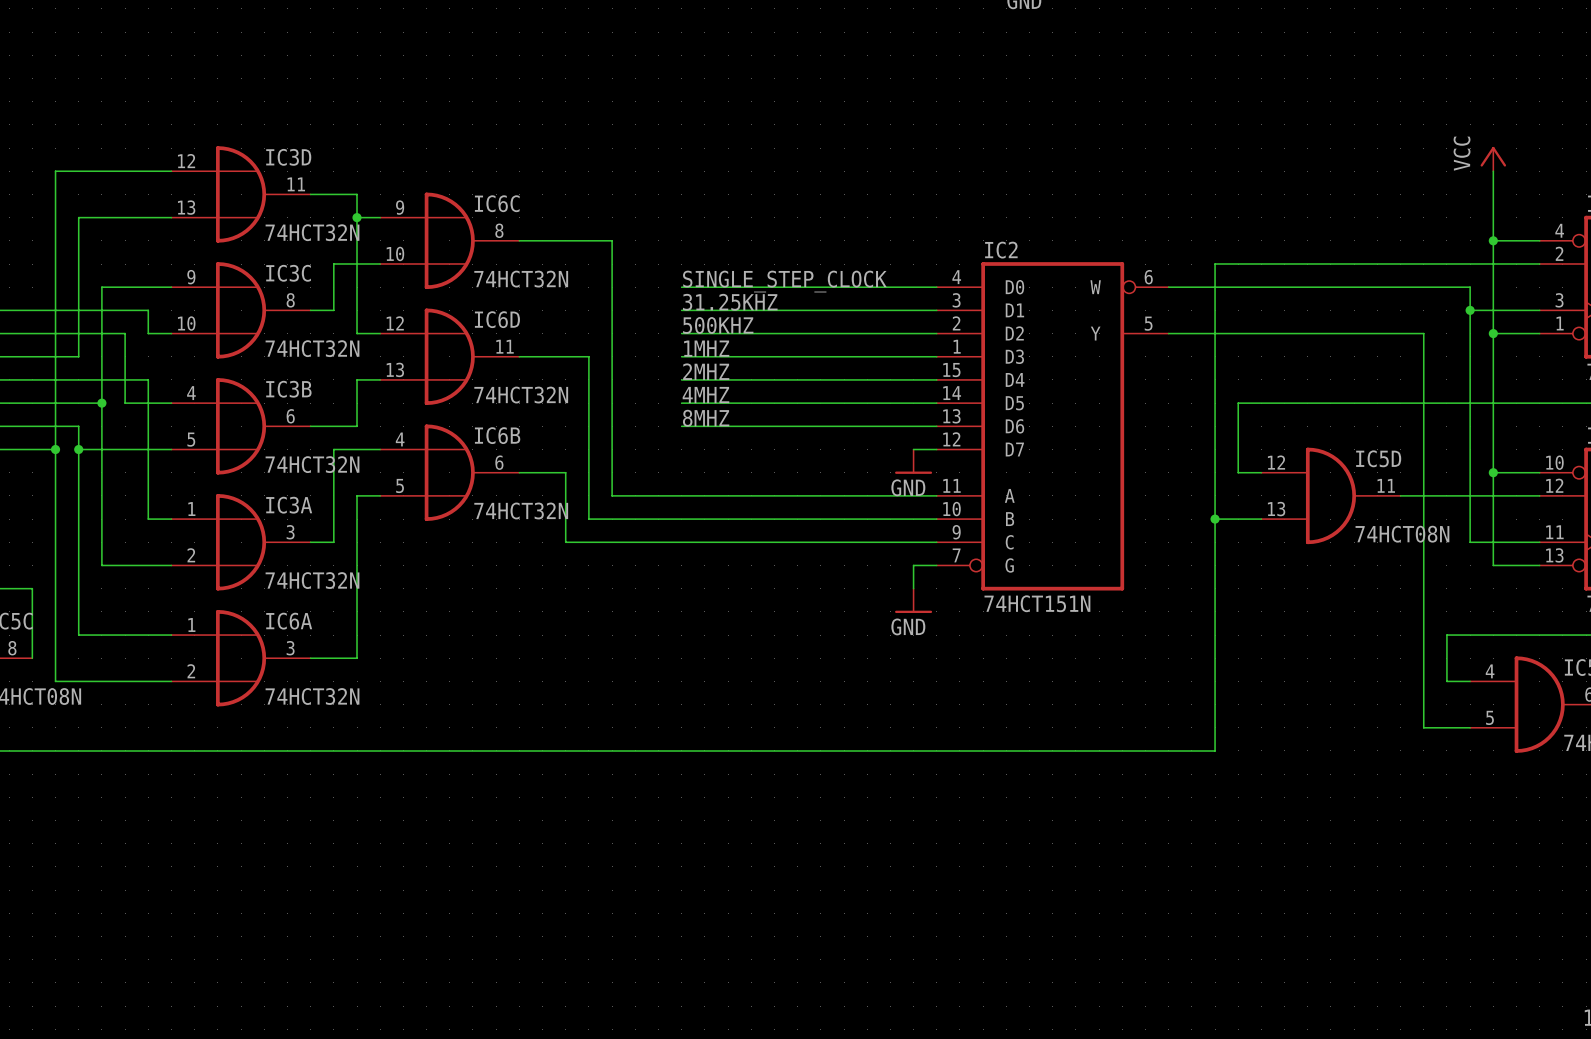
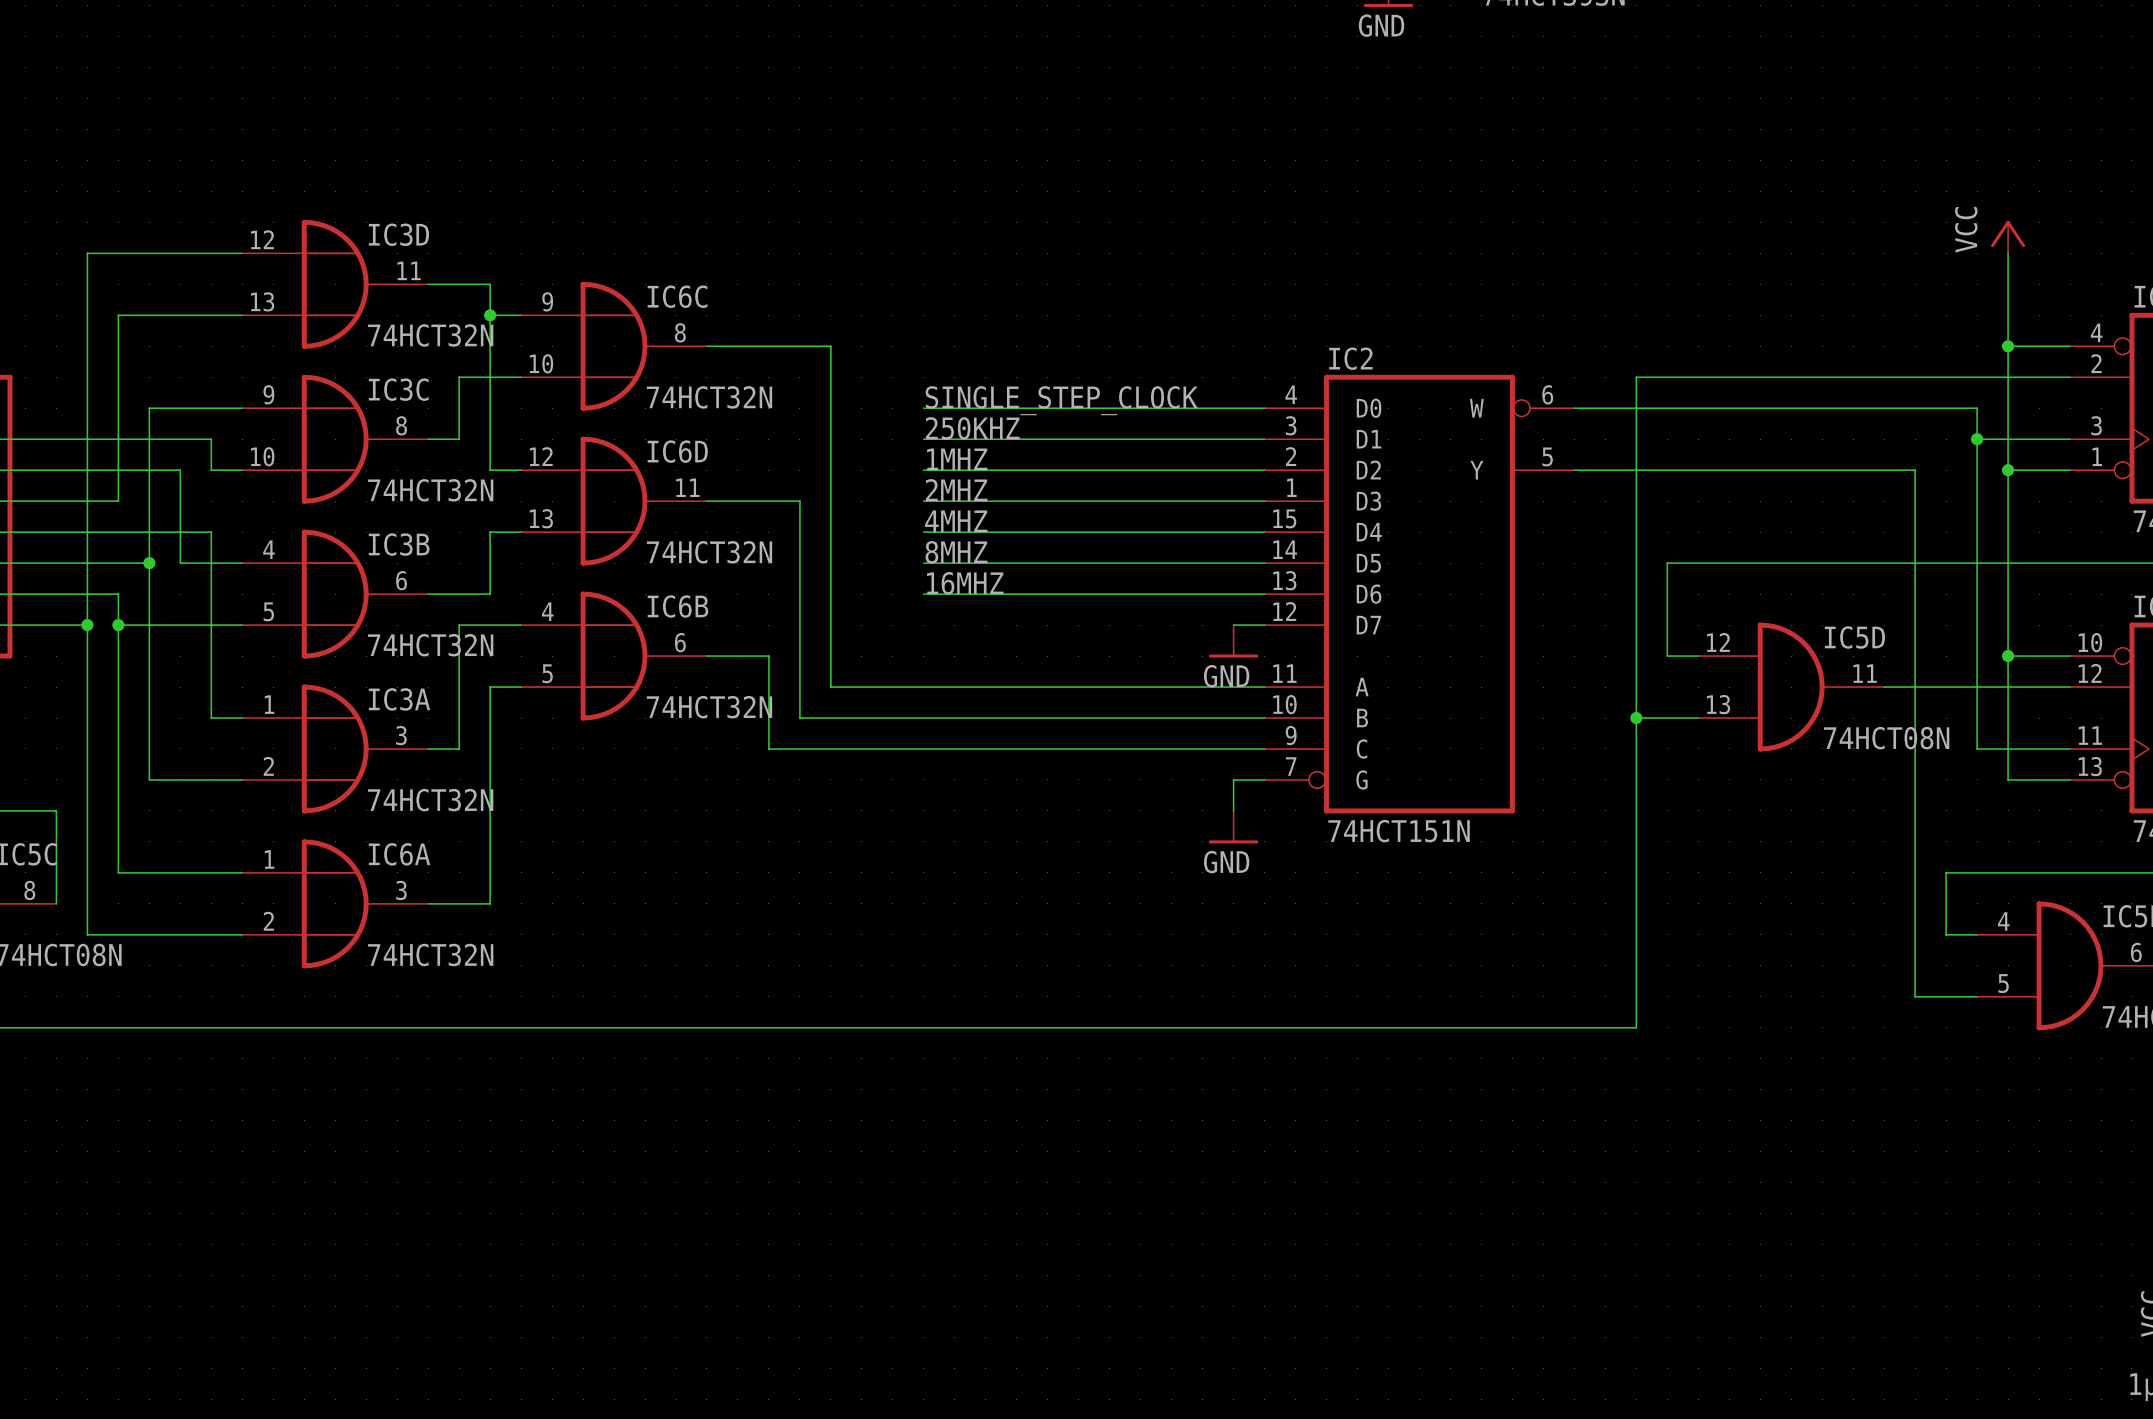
label: 31.25KHZ (730, 302) -> 250KHZ (972, 428)
label: 500KHZ (718, 325) -> 1MHZ (957, 459)
label: 1MHZ (706, 348) -> 2MHZ (956, 490)
label: 2MHZ (706, 371) -> 4MHZ (956, 521)
label: 4MHZ (705, 395) -> 8MHZ (956, 552)
label: 8MHZ (706, 418) -> 16MHZ (965, 583)

